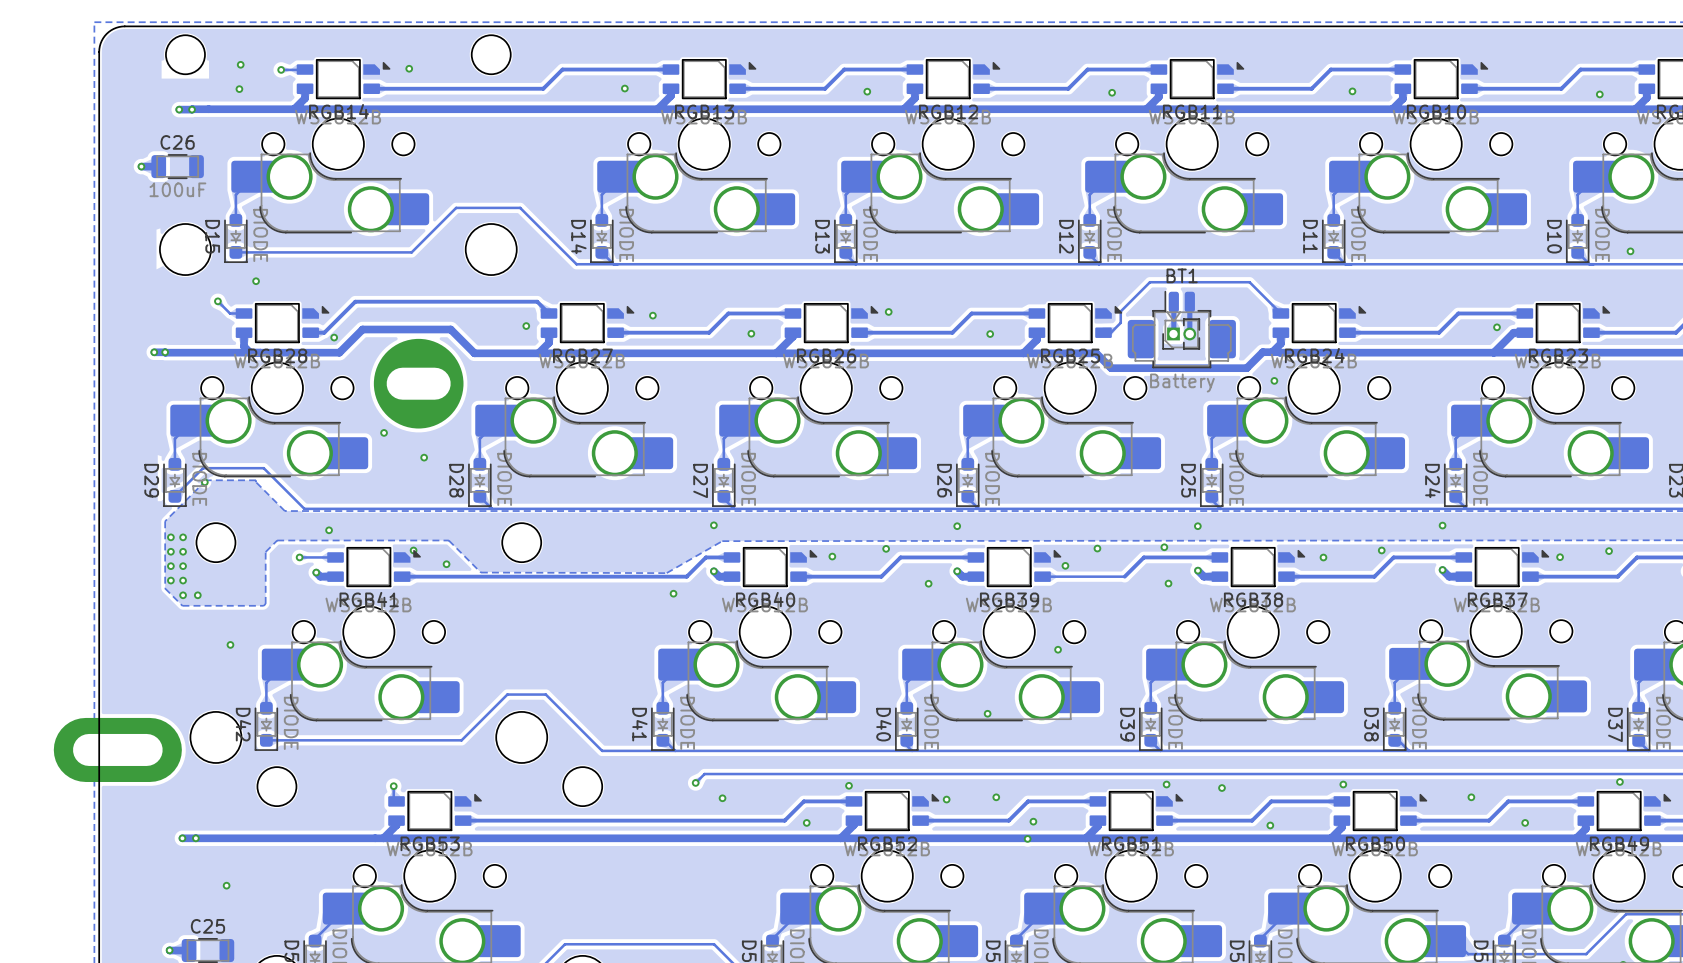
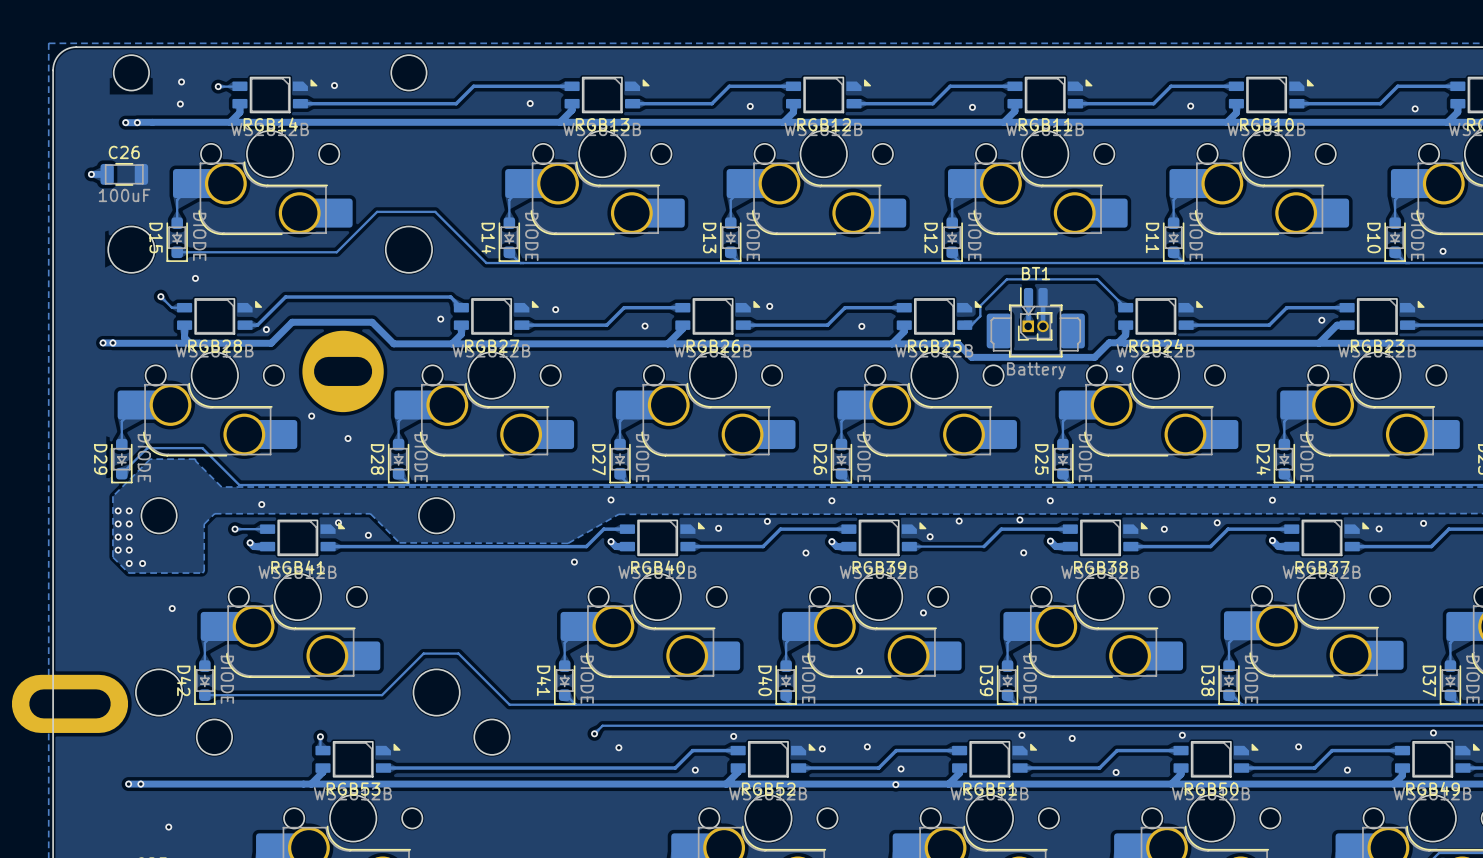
via: (204, 482) -> none

